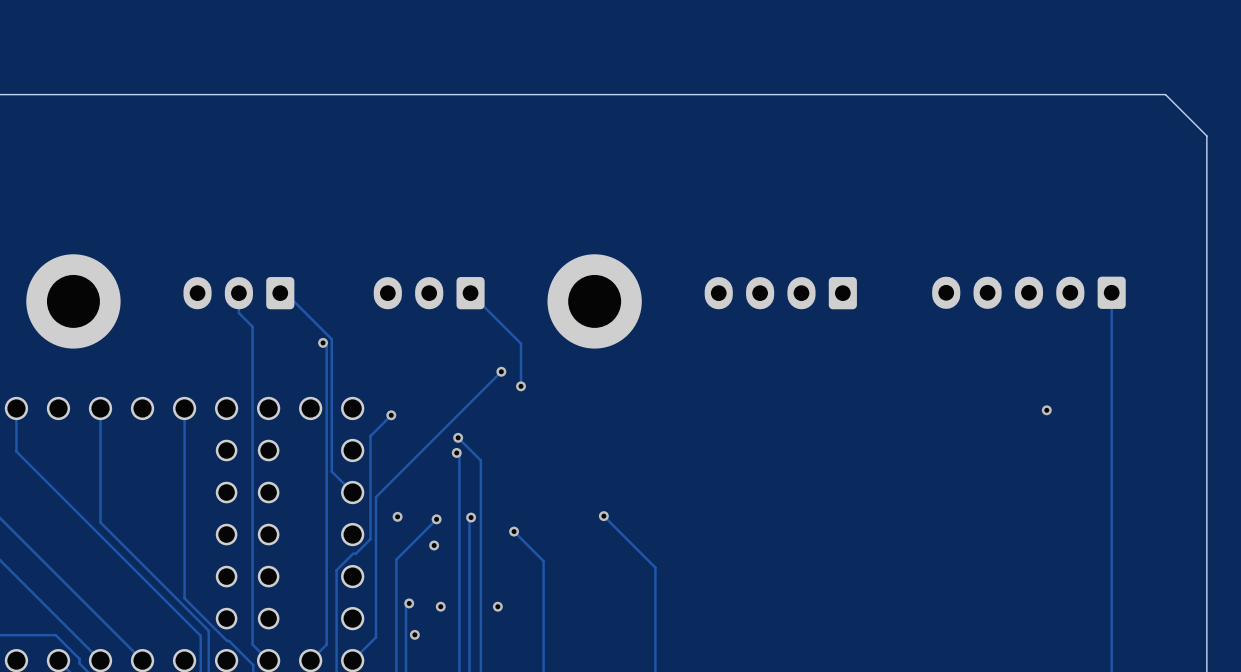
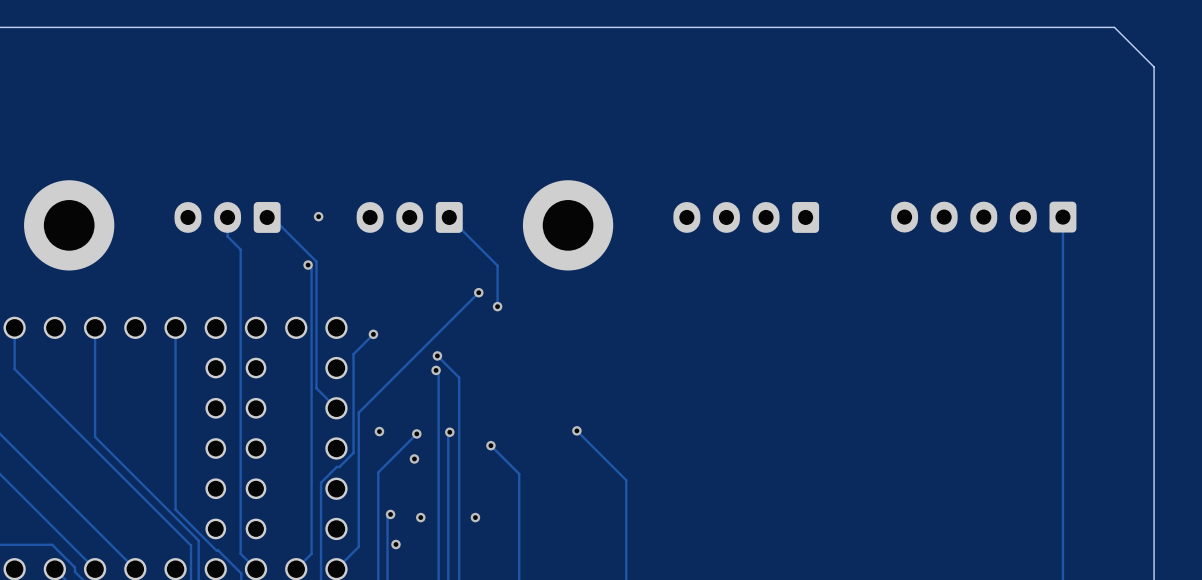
via: none -> (318, 216)
via: (1046, 410) -> none

